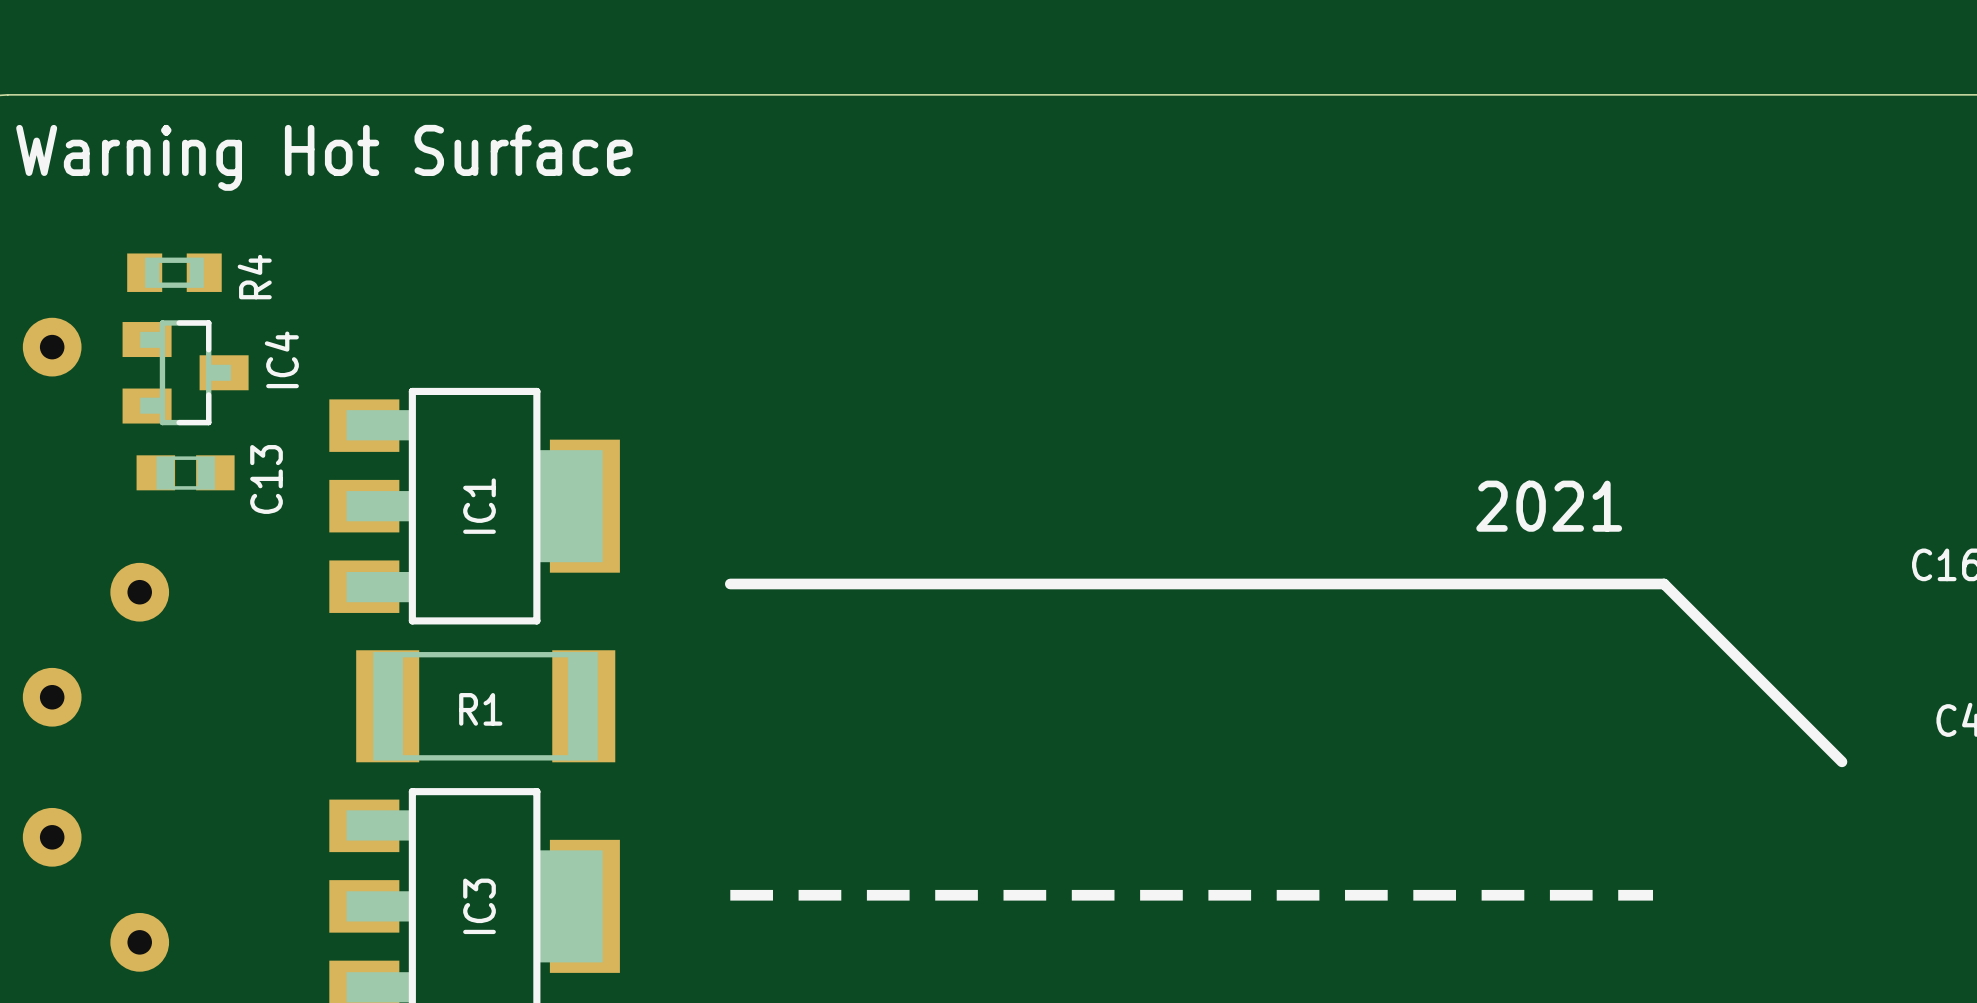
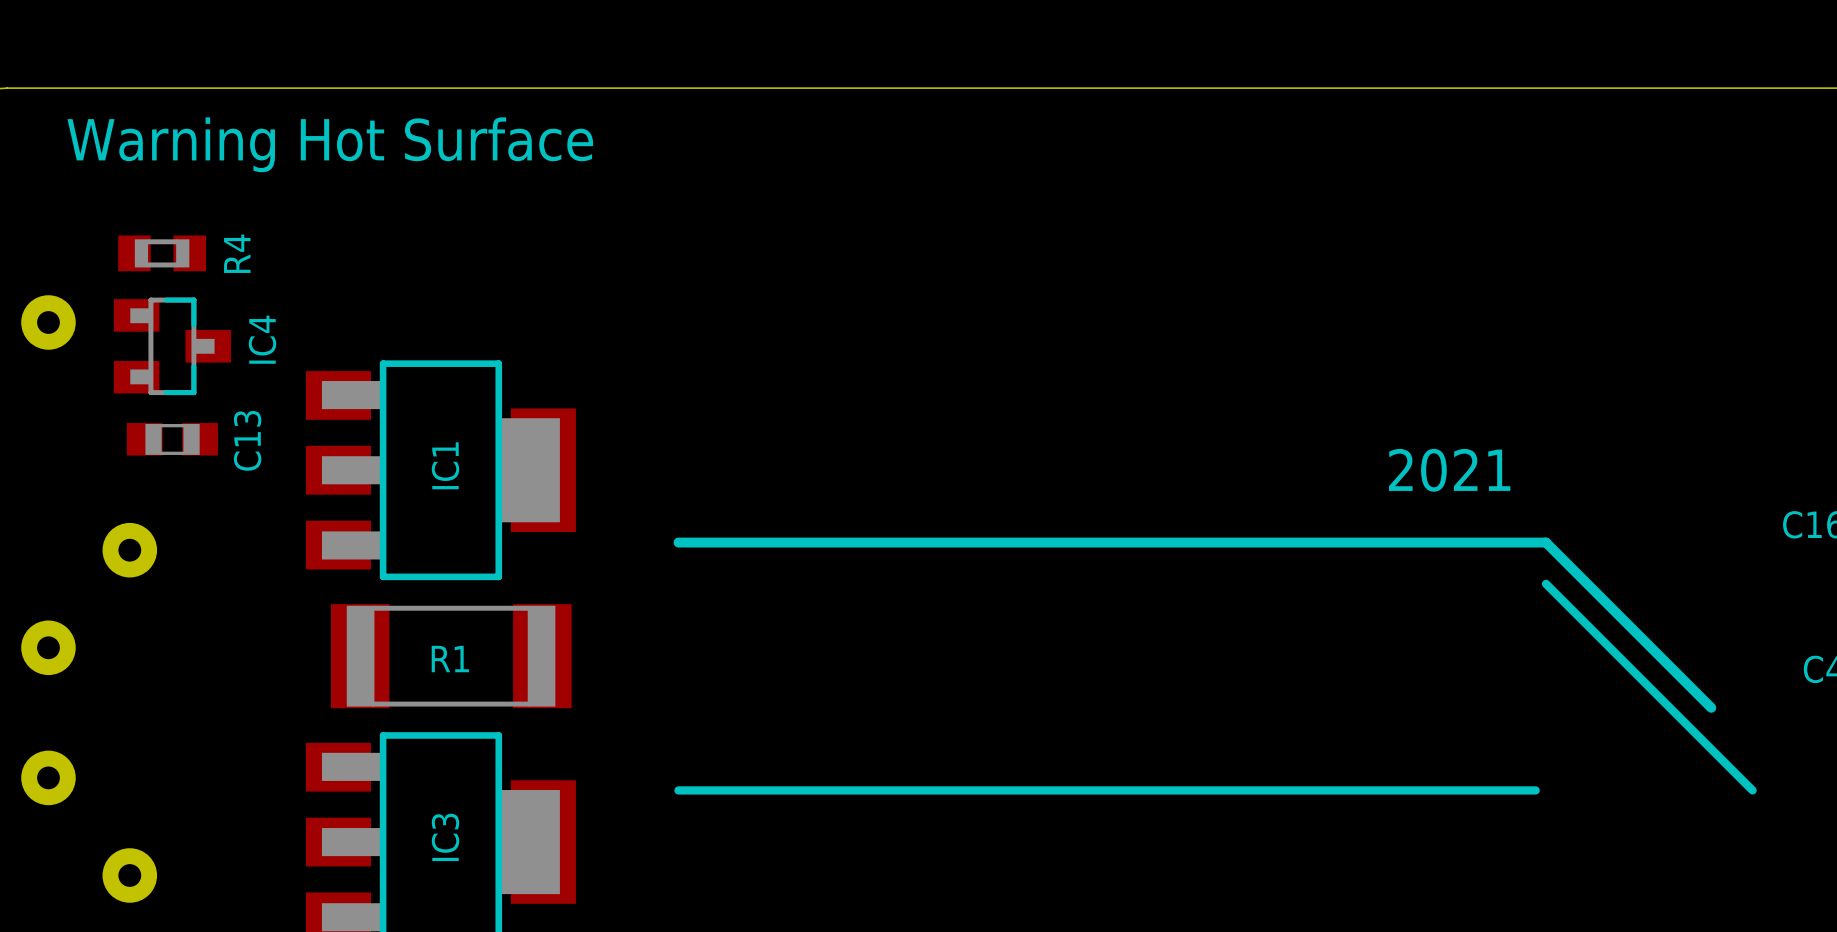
line: none -> (1546, 583) (1752, 790)
line: (730, 895) (1652, 895) -> (678, 790) (1535, 790)

